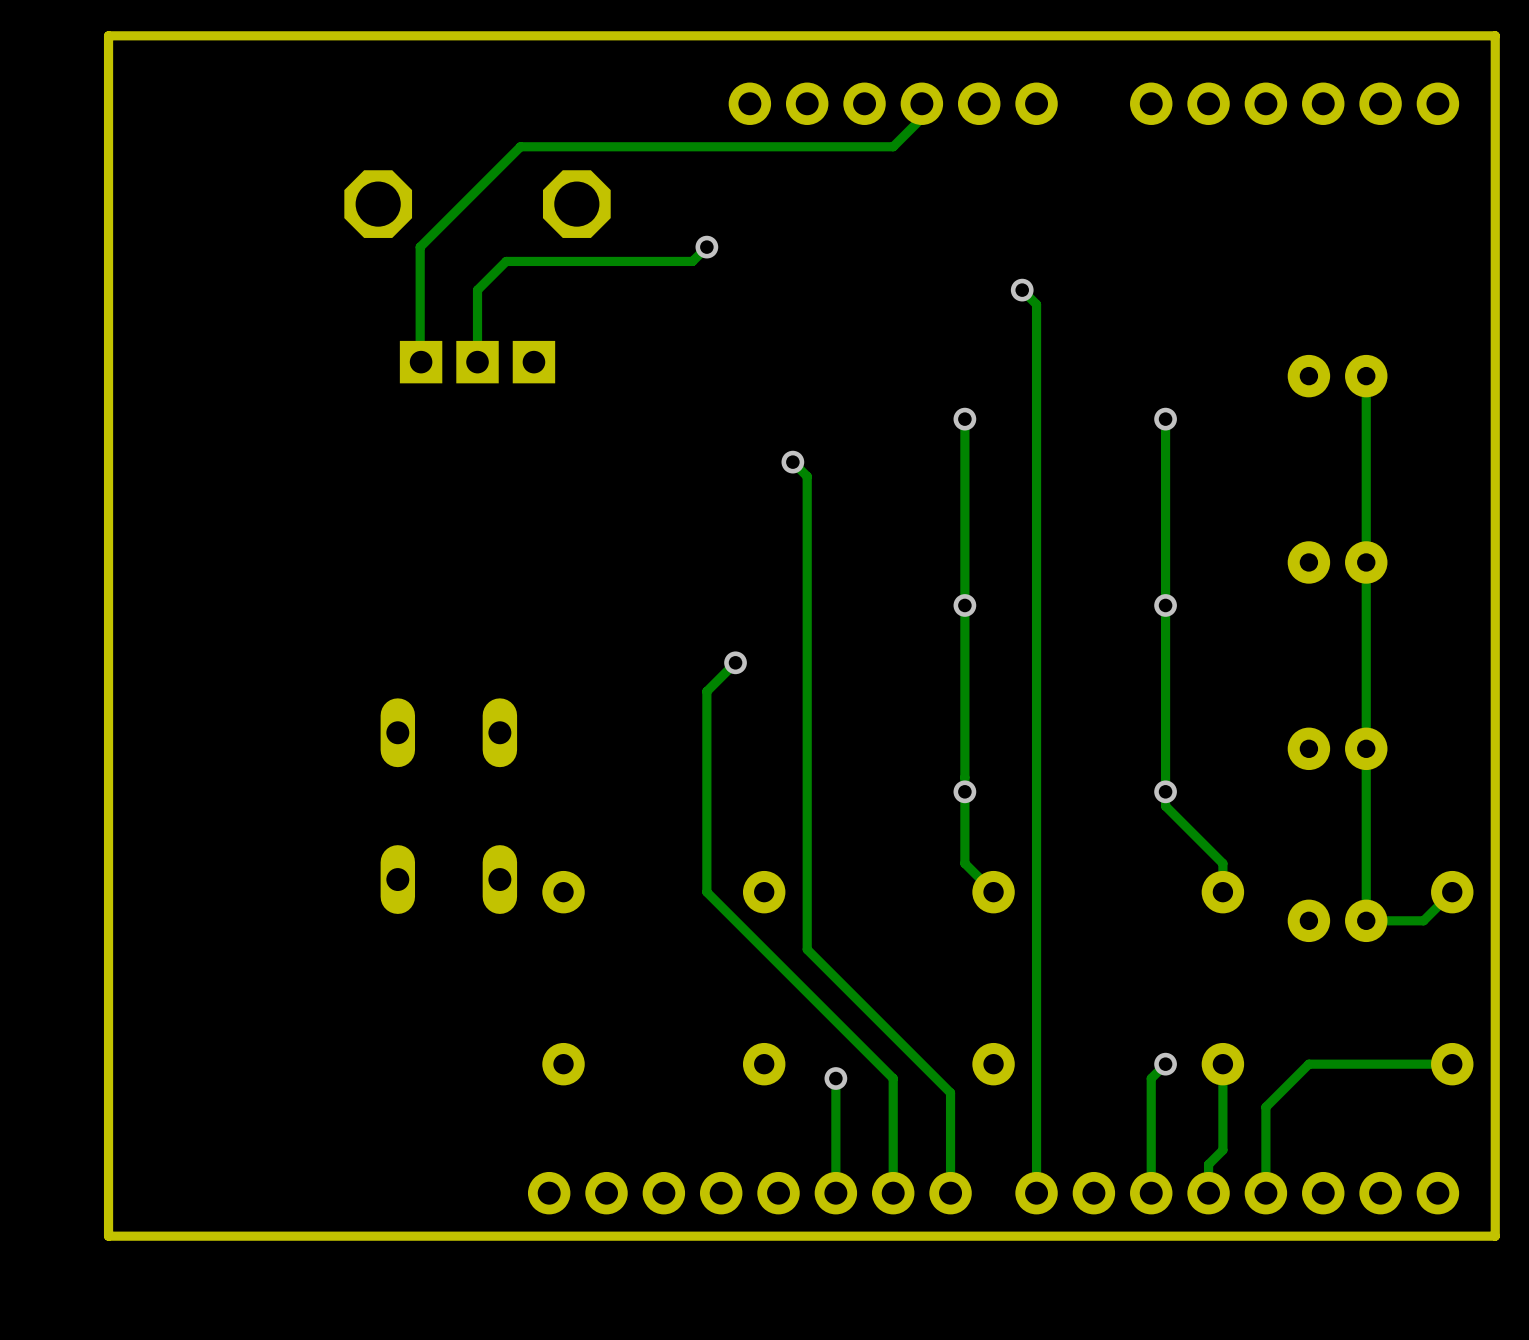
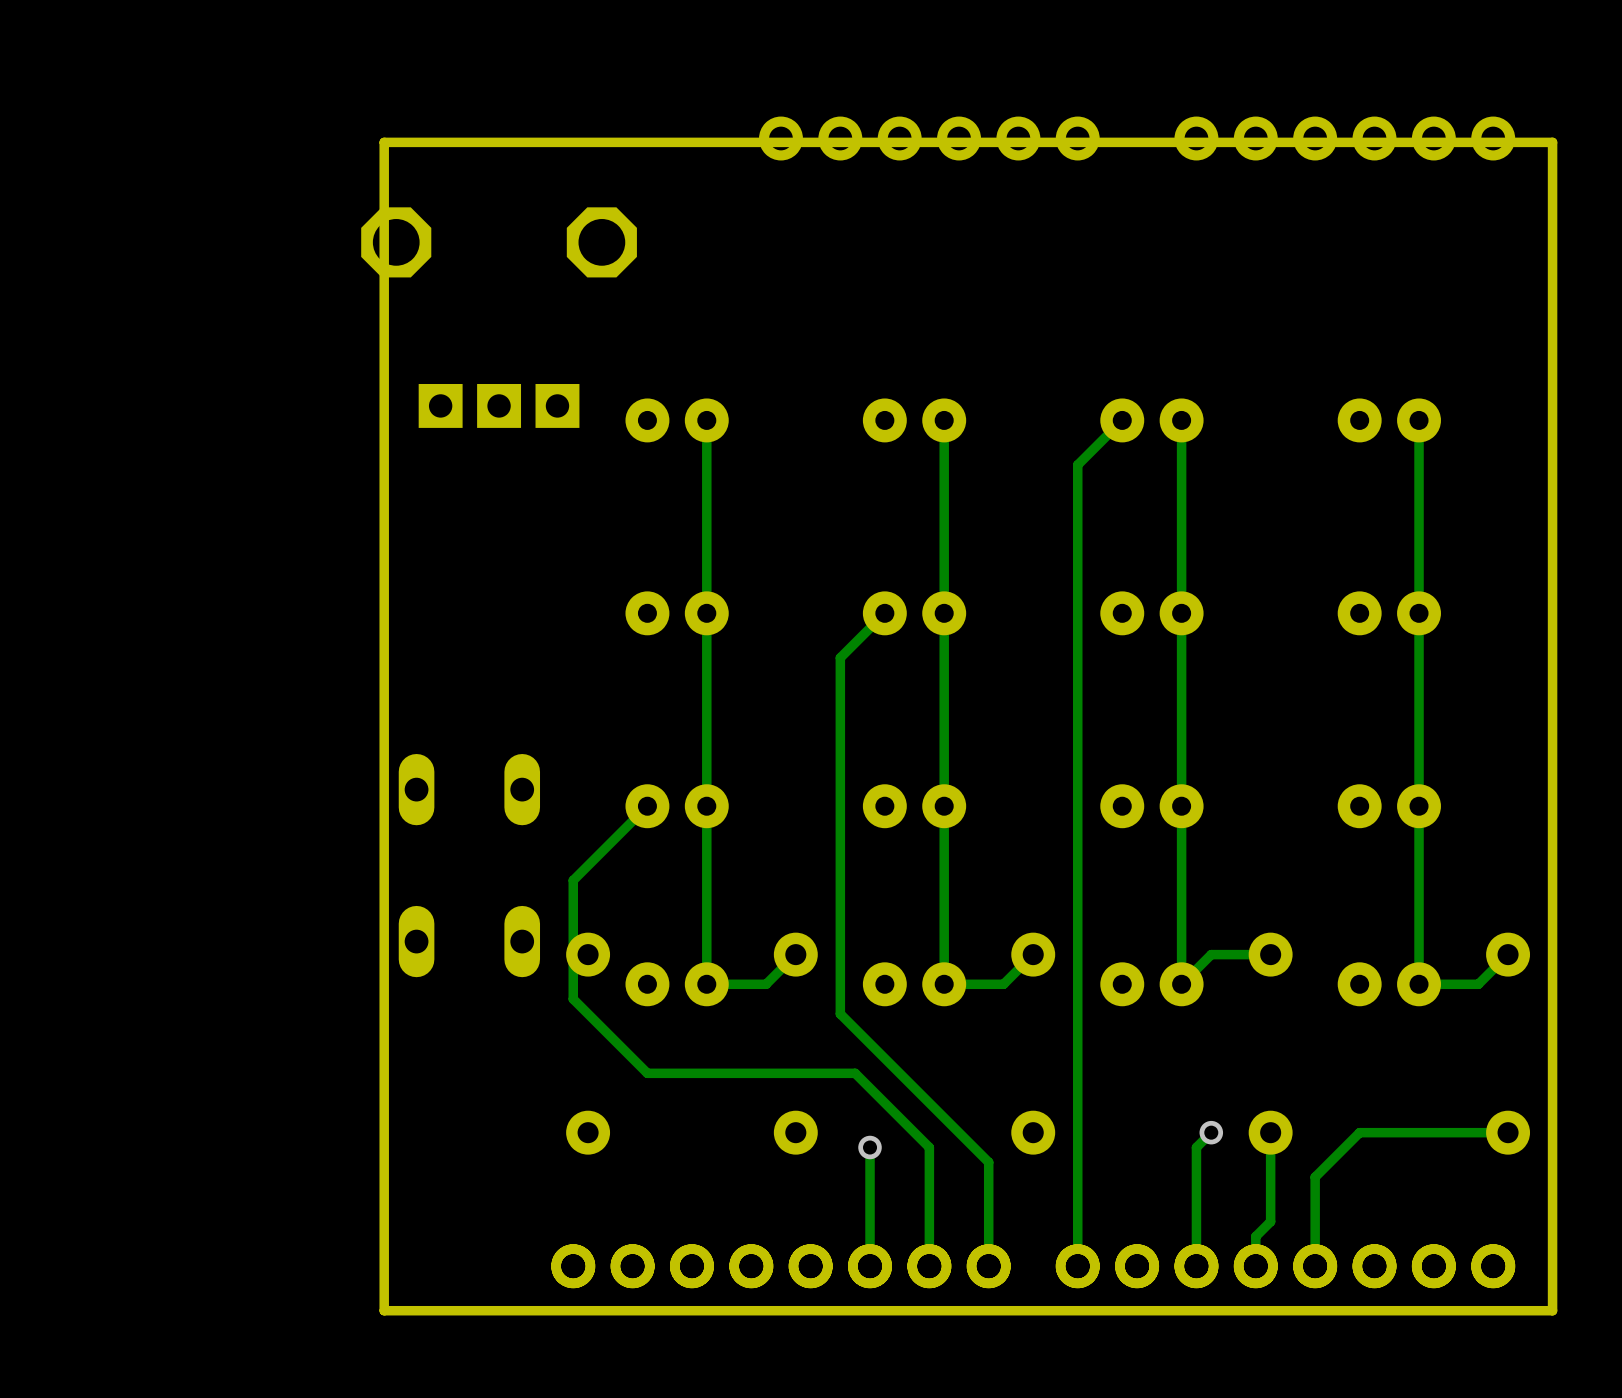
track: (921, 103) (921, 118) (893, 146) (520, 146) (420, 247) (421, 362) -> none
board edge: (1495, 107) (1495, 35) (108, 35) (108, 1236) (366, 1236) -> (1552, 142) (384, 142) (384, 1310)
track: (706, 247) (692, 261) (506, 261) (477, 290) (477, 362) -> none
via: (706, 247) -> none
track: (1022, 290) (1036, 304) (1036, 419) -> (1122, 420) (1077, 464)
via: (1022, 290) -> none
part: none -> (677, 420)
track: none -> (706, 420) (706, 984) (766, 984) (795, 954)
part: none -> (914, 420)
part: none -> (1151, 420)
track: (964, 419) (964, 863) (993, 892) -> (944, 420) (944, 984) (1003, 984) (1033, 954)
via: (964, 419) -> none
track: (1165, 419) (1165, 806) (1222, 863) (1222, 892) -> (1181, 420) (1181, 984) (1211, 954) (1270, 954)
via: (1165, 419) -> none
track: (792, 462) (807, 476) (807, 605) -> (884, 613) (840, 657)
via: (792, 462) -> none
part: none -> (677, 613)
part: none -> (914, 613)
part: none -> (1151, 613)
via: (964, 605) -> none
via: (1165, 605) -> none
track: (735, 662) (706, 691) (706, 892) (821, 1006) -> (647, 806) (573, 880) (573, 999) (647, 1073) (855, 1073)
via: (735, 662) -> none
part: none -> (677, 806)
part: none -> (914, 806)
part: none -> (1151, 806)
via: (964, 791) -> none
via: (1165, 791) -> none
part: none -> (677, 984)
part: none -> (914, 984)
part: none -> (1151, 984)
part: none -> (1033, 1266)

